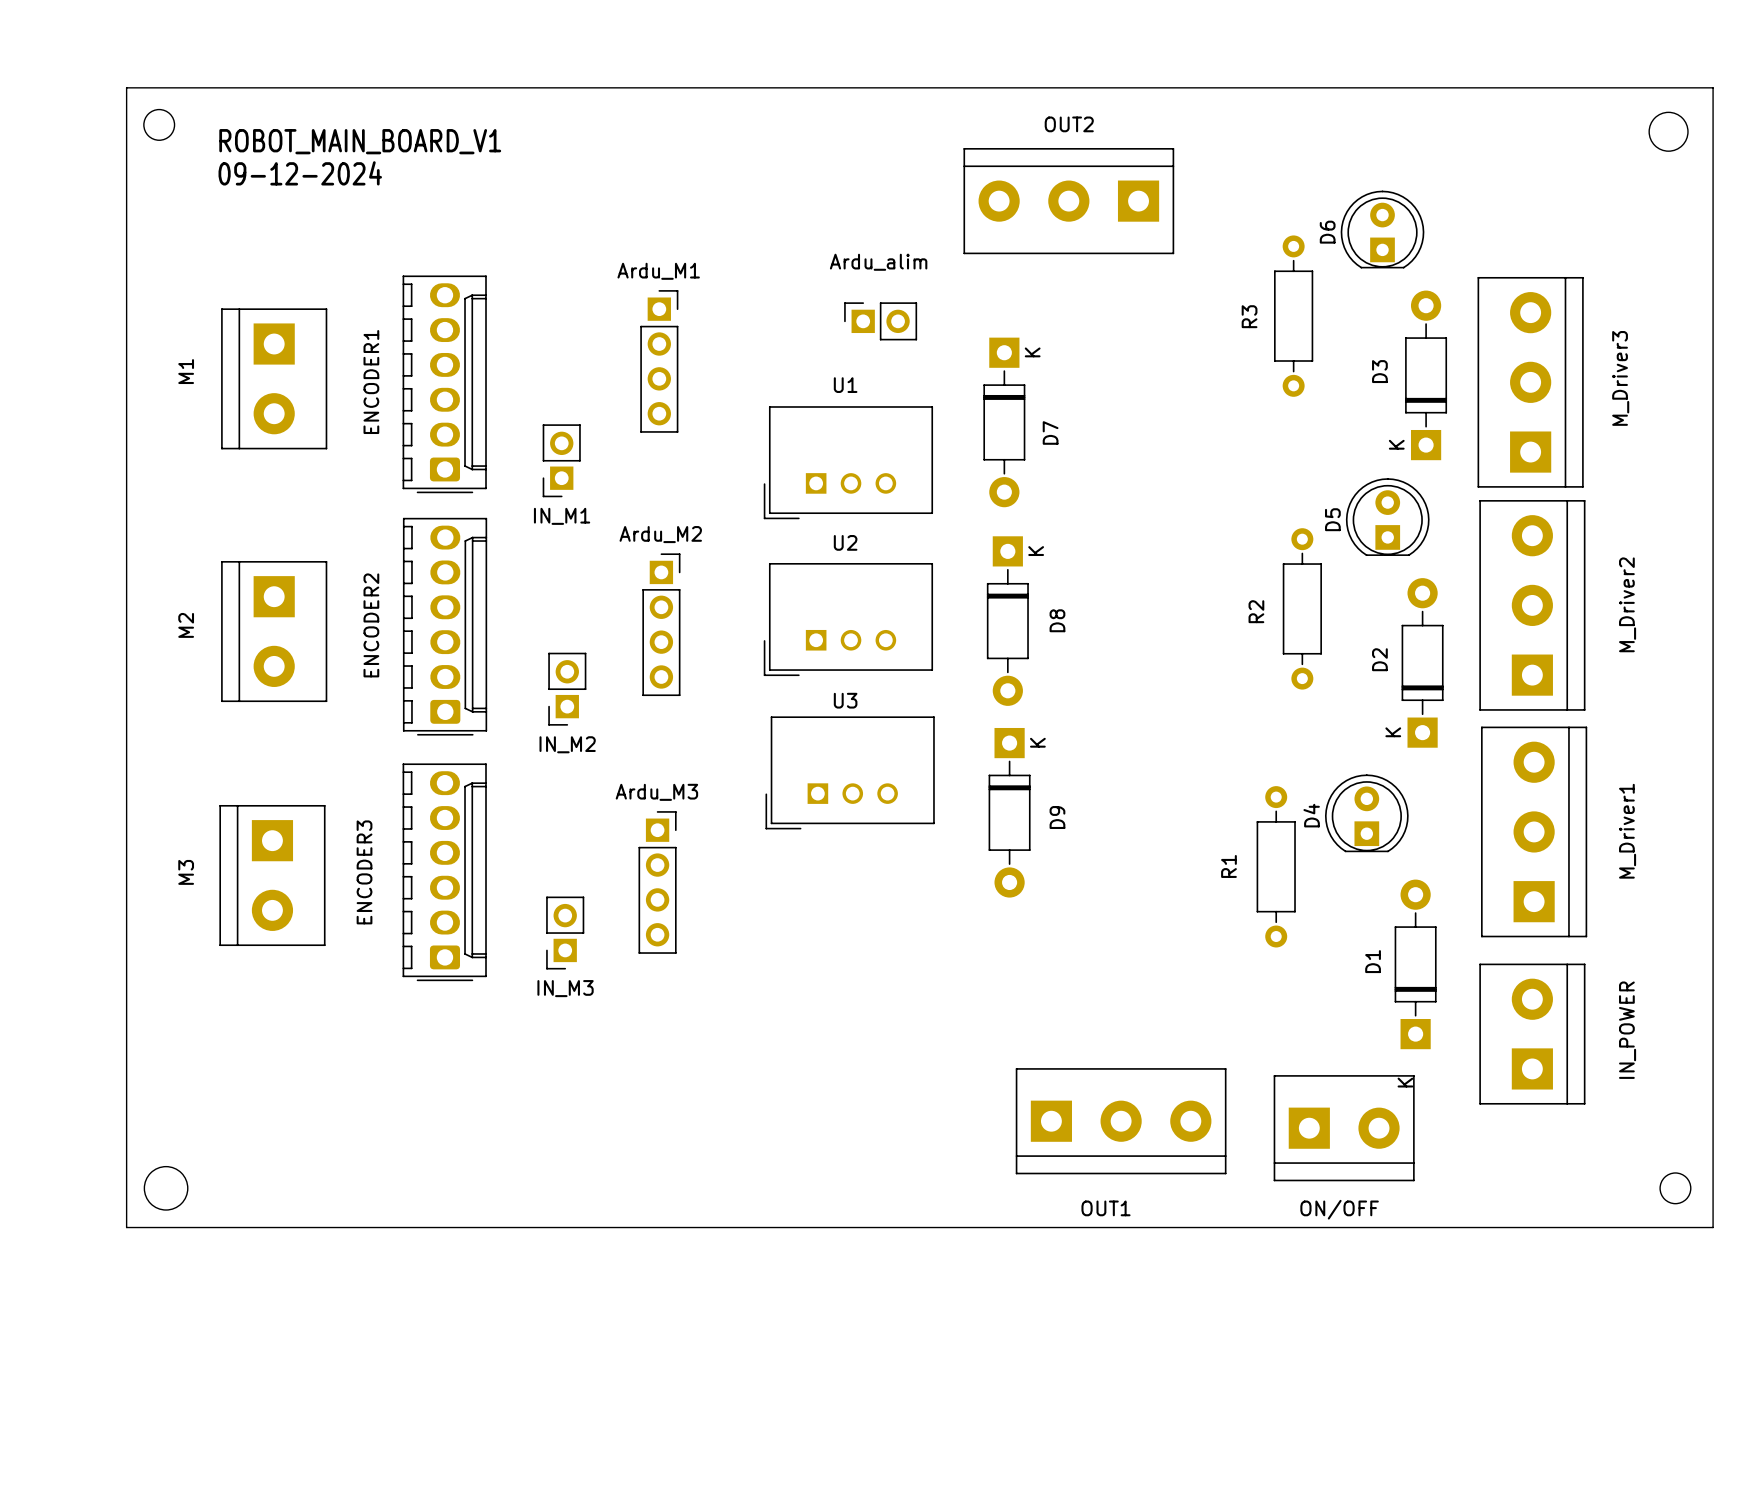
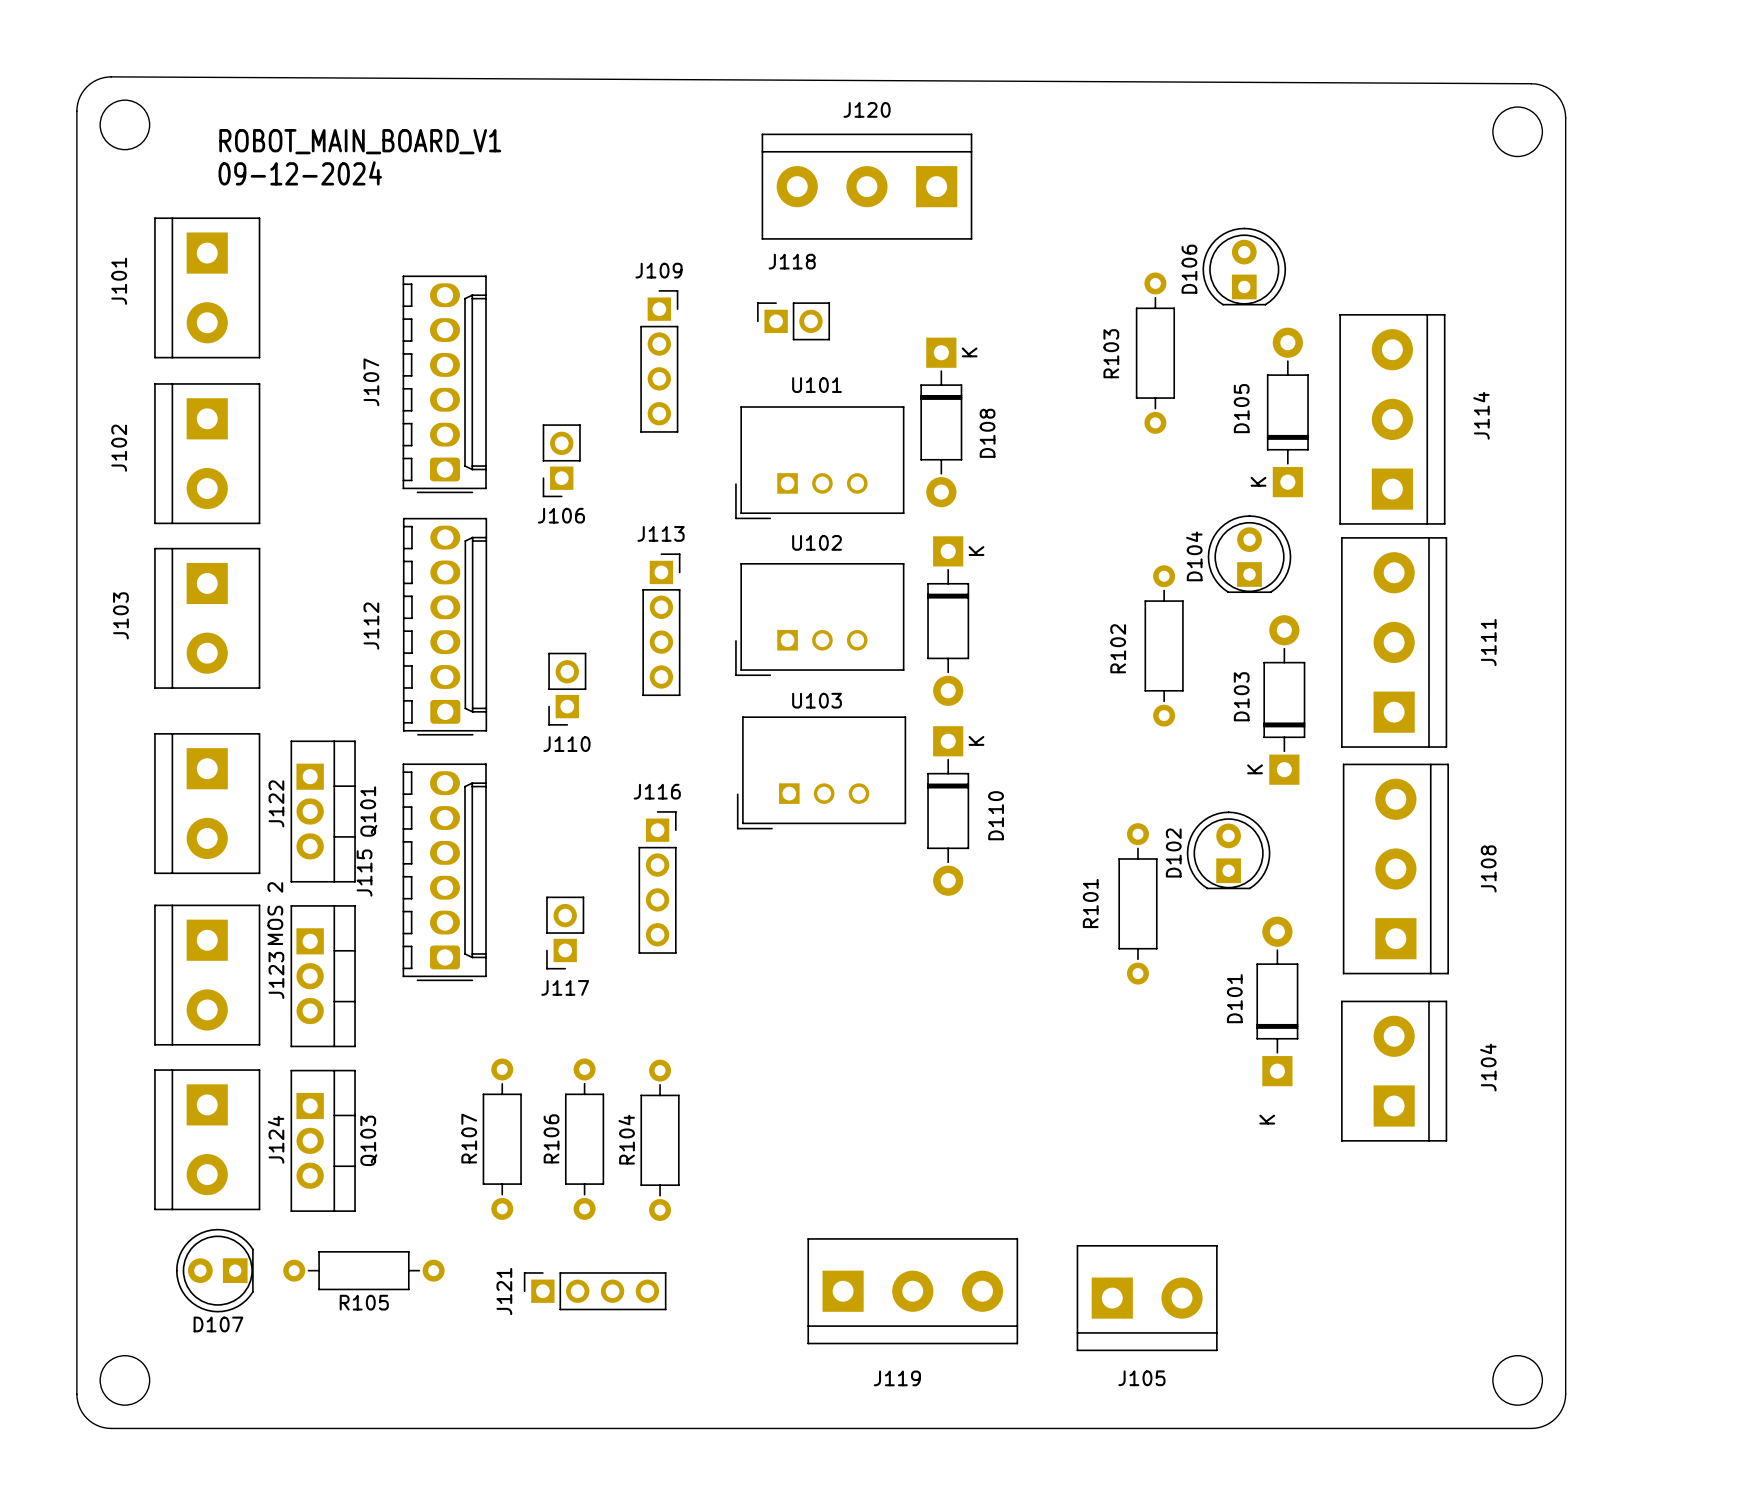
board edge: (126, 87) (1713, 87) (1713, 1227) (126, 1227) (126, 87) -> (111, 76) (96, 80) (86, 86) (80, 96) (76, 111) (76, 1394) (80, 1409) (86, 1418) (96, 1425) (111, 1428) (1531, 1428) (1542, 1426) (1555, 1418) (1563, 1405) (1565, 1394) (1565, 118) (1562, 103) (1555, 93) (1546, 87) (1531, 83) (111, 76)
round board edge: none -> [99, 99, 151, 151]
round board edge: none -> [1492, 106, 1544, 158]
round board edge: [143, 108, 176, 141] -> none
round board edge: [1648, 111, 1689, 152] -> none
J120: none -> (866, 186)
OUT2: (1068, 201) -> none
D6: (1382, 229) -> none
D106: none -> (1244, 266)
Ardu_M1 name: Ardu_M1 (658, 271) -> J109 (658, 270)
J101: none -> (207, 287)
R3: (1293, 316) -> none
J118: none -> (793, 321)
Ardu_alim: (880, 321) -> none
R103: none -> (1155, 353)
D3: (1426, 375) -> none
M1: (274, 378) -> none
ENCODER1 name: ENCODER1 (371, 382) -> J107 (371, 382)
M_Driver3: (1530, 382) -> none
D105: none -> (1287, 412)
J114: none -> (1392, 419)
D108: none -> (941, 422)
D7: (1004, 422) -> none
J102: none -> (207, 453)
U101: none -> (819, 462)
U1: (848, 462) -> none
IN_M1 name: IN_M1 (562, 516) -> J106 (561, 515)
D5: (1387, 517) -> none
Ardu_M2 name: Ardu_M2 (660, 534) -> J113 (661, 533)
D104: none -> (1249, 554)
M_Driver2: (1532, 605) -> none
R2: (1302, 608) -> none
J103: none -> (207, 618)
U102: none -> (819, 619)
U2: (848, 619) -> none
part: none -> (948, 621)
D8: (1007, 621) -> none
ENCODER2 name: ENCODER2 (371, 625) -> J112 (371, 626)
M2: (274, 631) -> none
J111: none -> (1394, 642)
R102: none -> (1164, 645)
D2: (1422, 662) -> none
D103: none -> (1284, 699)
IN_M2 name: IN_M2 (567, 744) -> J110 (566, 744)
U103: none -> (821, 772)
U3: (850, 772) -> none
Ardu_M3 name: Ardu_M3 (656, 792) -> J116 (657, 791)
J122: none -> (207, 803)
D110: none -> (948, 810)
Q101: none -> (323, 811)
D9: (1009, 812) -> none
D4: (1366, 813) -> none
M_Driver1: (1534, 831) -> none
D102: none -> (1228, 850)
R1: (1276, 866) -> none
J108: none -> (1395, 869)
ENCODER3 name: ENCODER3 (364, 872) -> J115 (364, 873)
M3: (272, 875) -> none
R101: none -> (1137, 903)
D1: (1415, 964) -> none
J123: none -> (207, 975)
part: none -> MOS 2 (323, 976)
IN_M3 name: IN_M3 (565, 988) -> J117 (565, 987)
D101: none -> (1277, 1001)
IN_POWER: (1532, 1034) -> none
J104: none -> (1394, 1071)
OUT1: (1121, 1121) -> none
ON/OFF: (1344, 1128) -> none
J124: none -> (207, 1139)
R107: none -> (502, 1139)
R106: none -> (584, 1139)
Q103: none -> (323, 1140)
R104: none -> (660, 1140)
round board edge: [143, 1165, 189, 1211] -> none
round board edge: [1659, 1172, 1692, 1205] -> none
D107: none -> (214, 1270)
R105: none -> (363, 1270)
J121: none -> (595, 1291)
J119: none -> (912, 1291)
J105: none -> (1147, 1298)
round board edge: none -> [99, 1355, 151, 1406]
round board edge: none -> [1492, 1355, 1544, 1406]

